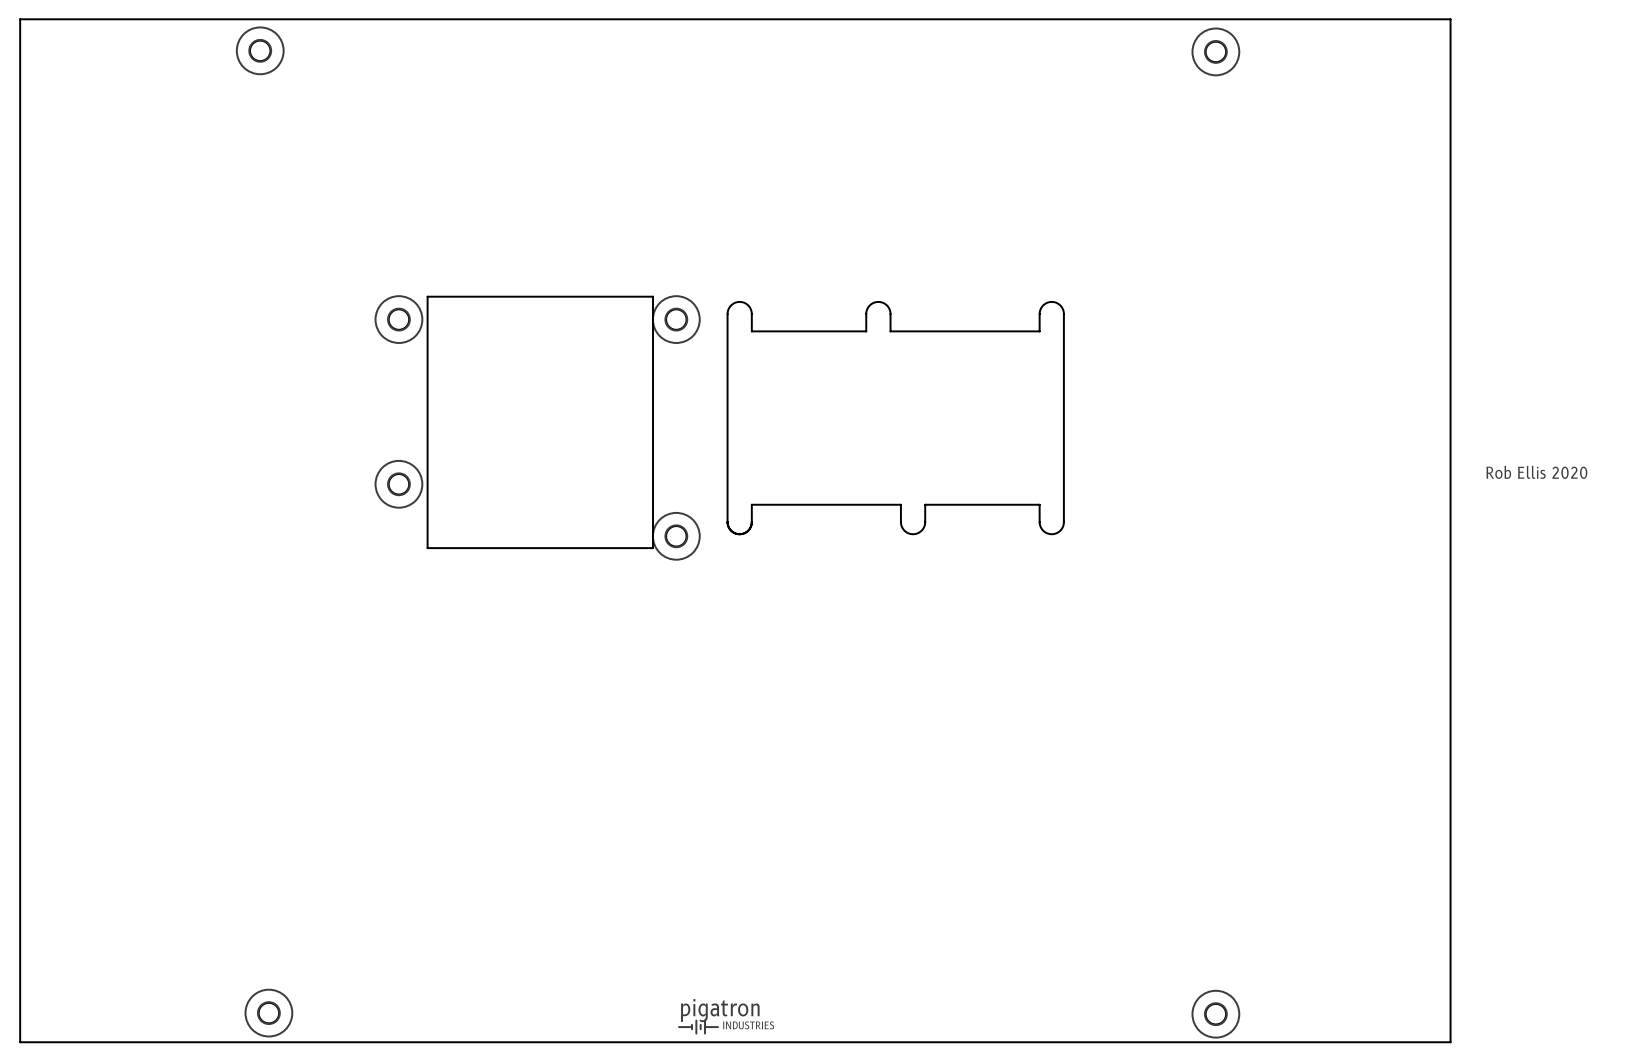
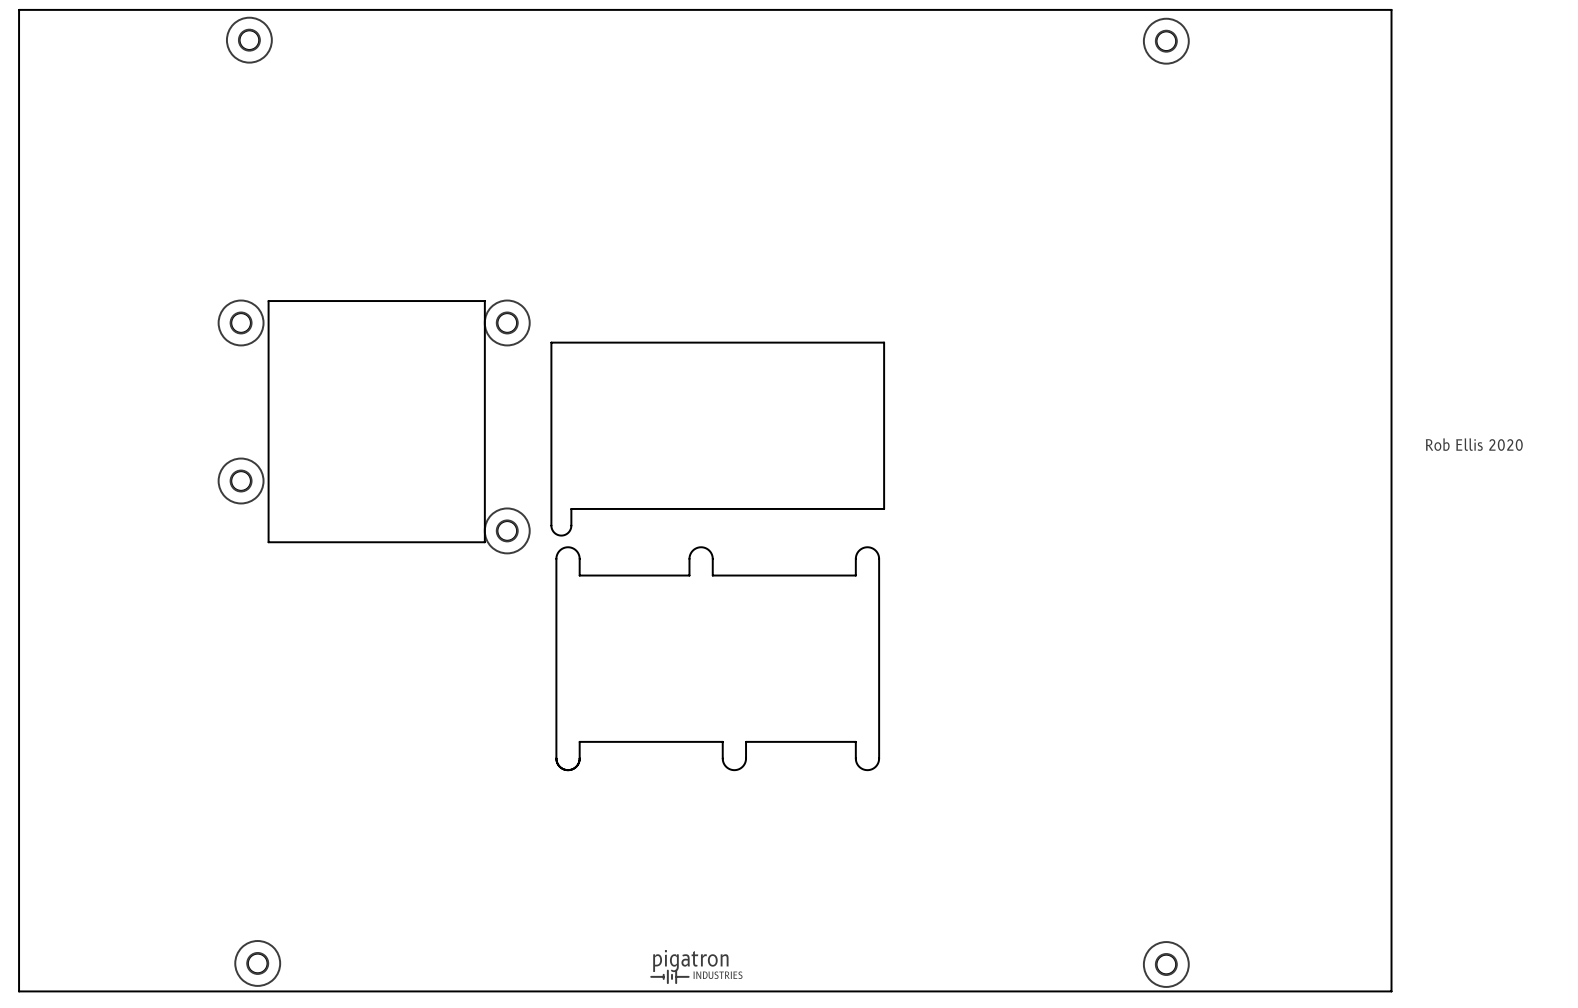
board edge: (427, 296) (427, 548) (653, 548) (653, 296) (427, 296) -> (268, 301) (268, 542) (484, 542) (484, 301) (268, 301)
part: (398, 319) -> none
part: (676, 319) -> none
part: none -> (241, 322)
part: none -> (507, 322)
board edge: none -> (551, 342) (551, 525) (556, 534) (563, 535) (570, 530) (571, 508) (884, 508) (884, 342) (551, 342)
part: (398, 484) -> none
part: none -> (241, 481)
board edge: (727, 522) (727, 314) (729, 307) (733, 303) (742, 302) (750, 307) (751, 331) (866, 331) (867, 309) (871, 304) (878, 301) (885, 304) (889, 309) (890, 331) (1039, 331) (1039, 312) (1043, 305) (1053, 302) (1061, 306) (1063, 314) (1063, 522) (1059, 531) (1050, 534) (1042, 529) (1039, 523) (1039, 504) (925, 504) (924, 526) (920, 531) (913, 534) (905, 531) (901, 526) (900, 504) (751, 504) (751, 522) -> none
board edge: (727, 522) (731, 530) (739, 534) (748, 530) (751, 522) -> none
board edge: (727, 522) (731, 530) (739, 534) (748, 530) (751, 522) -> none
part: (676, 536) -> none
part: none -> (507, 530)
board edge: none -> (556, 758) (556, 558) (557, 553) (562, 548) (571, 547) (578, 553) (579, 575) (689, 575) (690, 554) (694, 549) (701, 547) (708, 549) (711, 554) (712, 575) (855, 575) (855, 557) (859, 550) (869, 547) (876, 551) (879, 558) (879, 758) (874, 767) (865, 770) (858, 765) (855, 760) (855, 741) (746, 741) (745, 762) (741, 767) (734, 770) (727, 767) (723, 762) (722, 741) (579, 741) (579, 758)
board edge: none -> (556, 758) (559, 766) (568, 770) (576, 766) (579, 758)
board edge: none -> (556, 758) (559, 766) (568, 770) (576, 766) (579, 758)

